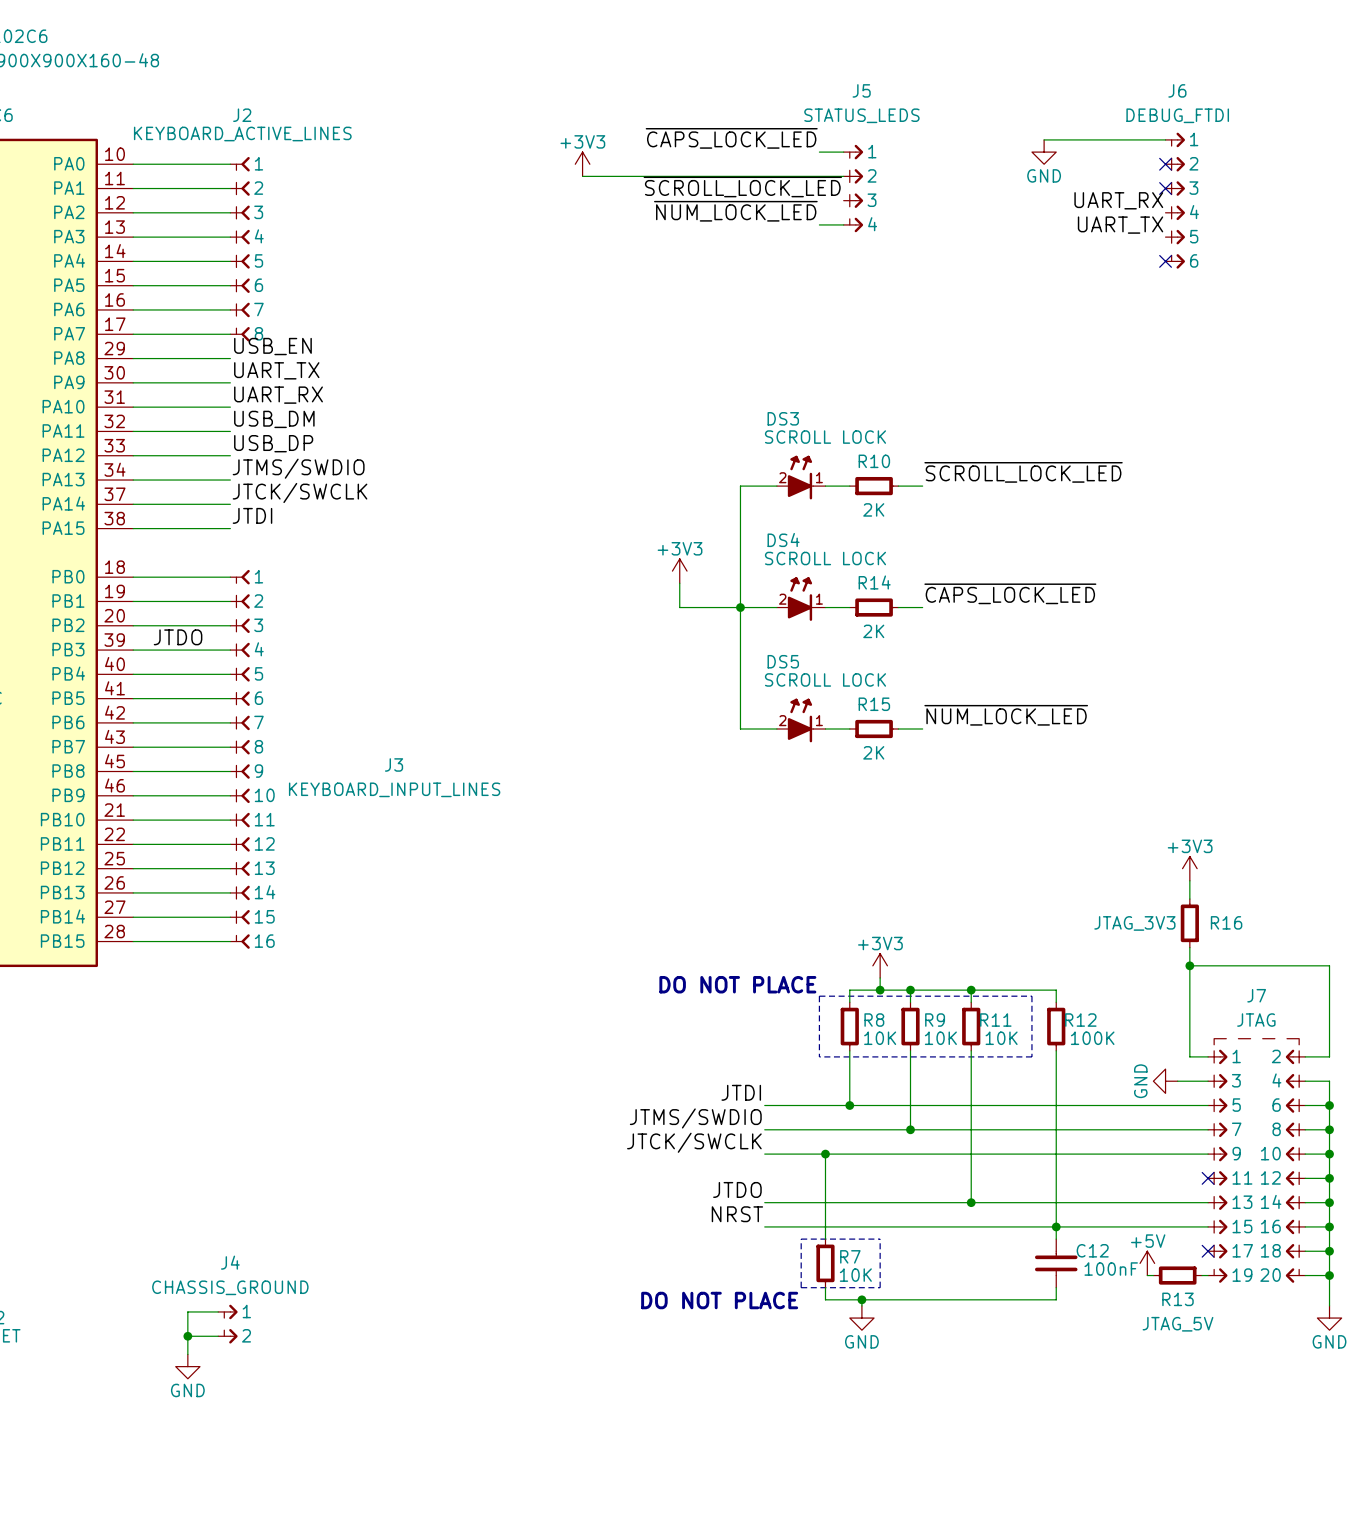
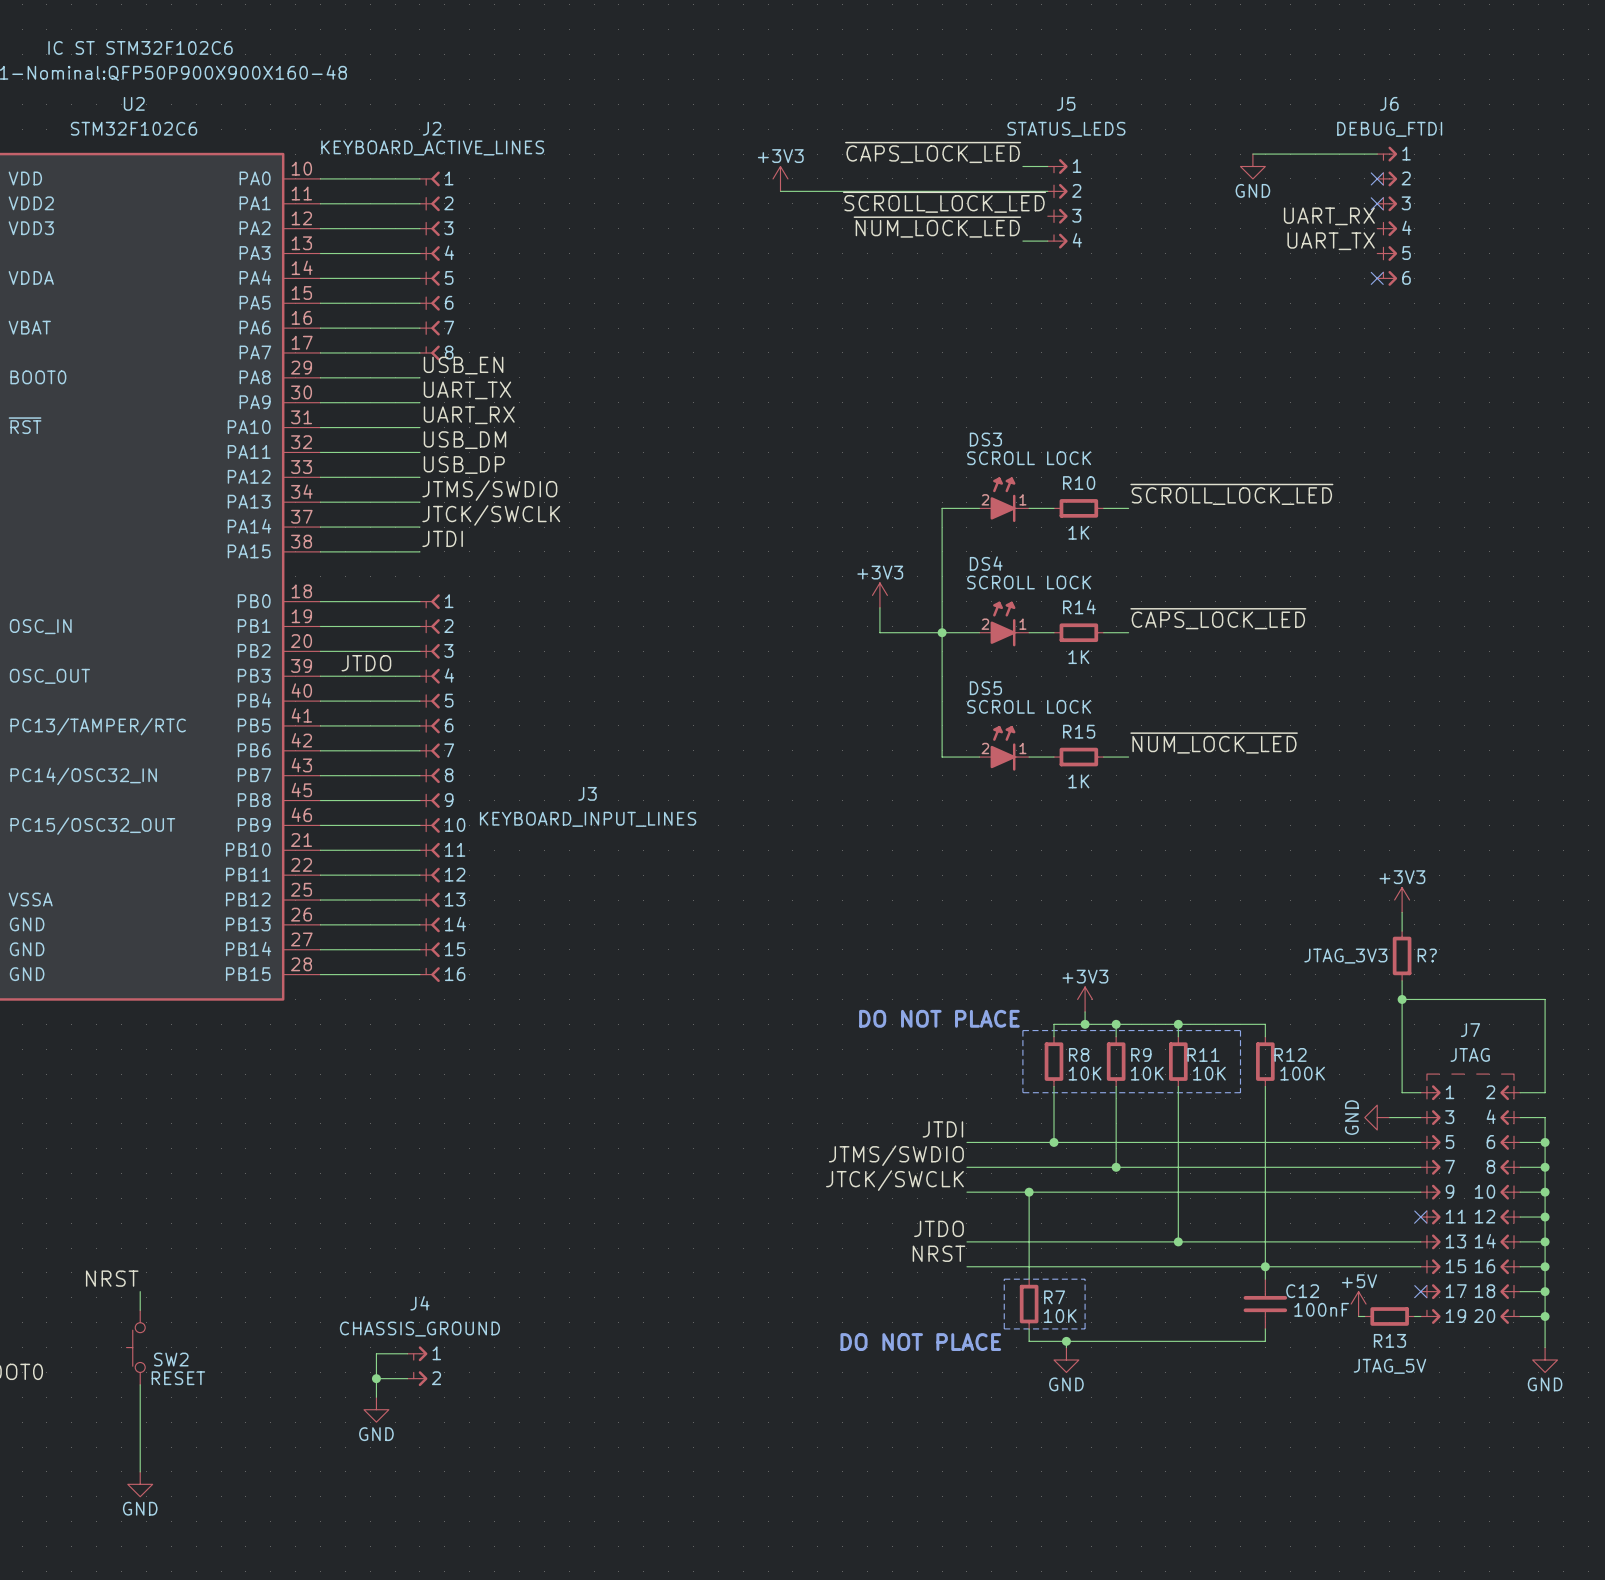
R10 value: 2K (873, 509) -> 1K (1078, 532)
R14 value: 2K (873, 631) -> 1K (1078, 657)
R15 value: 2K (873, 752) -> 1K (1078, 781)
R16 name: R16 (1226, 922) -> R? (1427, 955)

